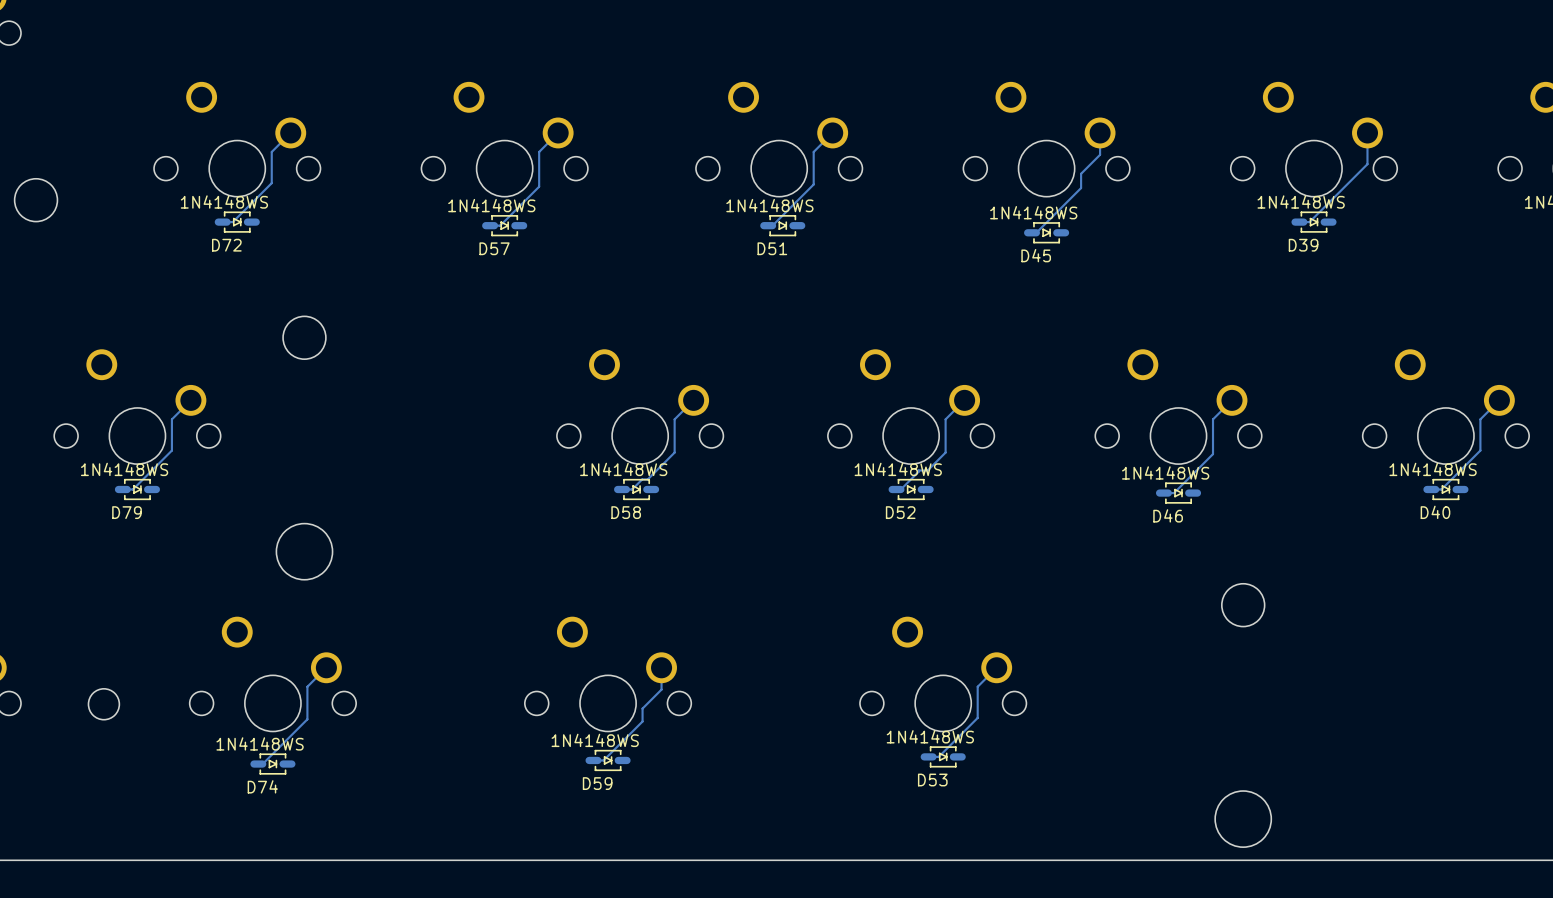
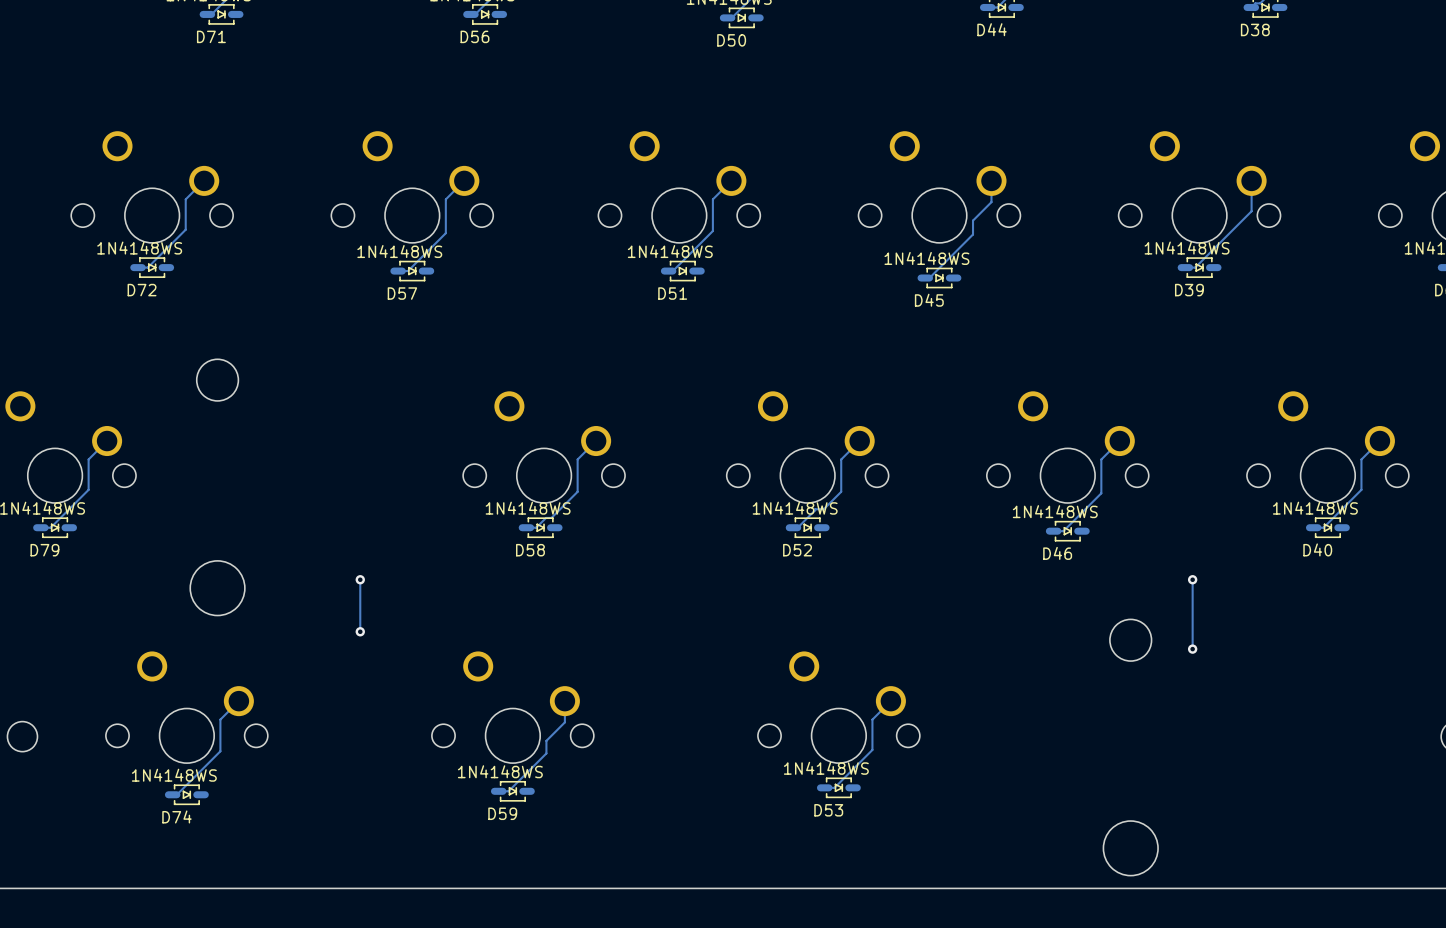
track: none -> (360, 579) (360, 631)
via: none -> (360, 579)
track: none -> (1192, 579) (1192, 649)
via: none -> (1192, 579)
via: none -> (360, 631)
via: none -> (1192, 649)

